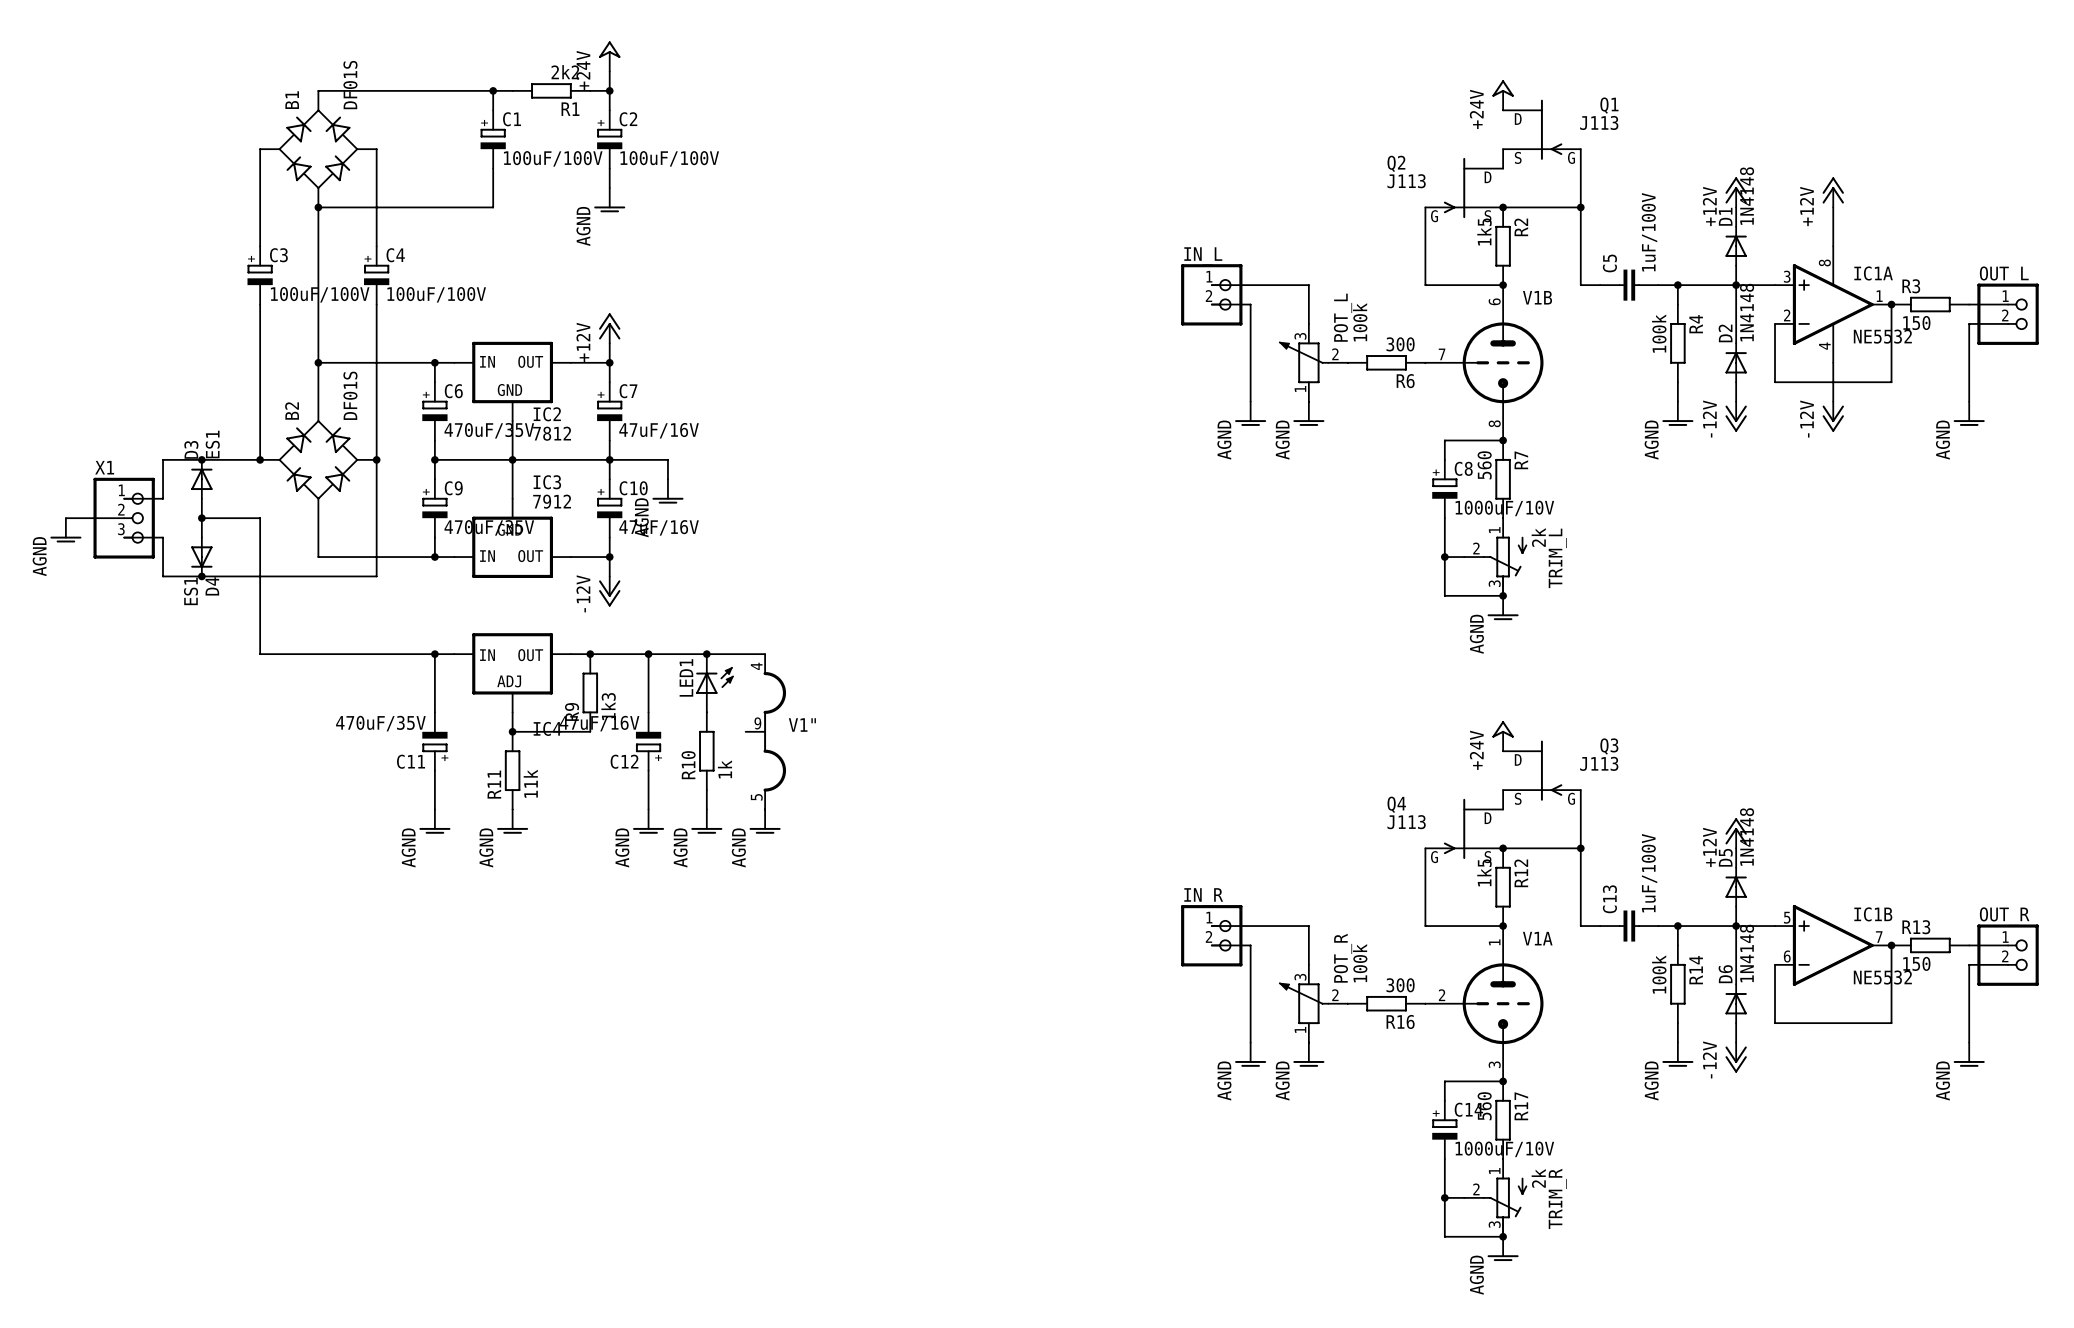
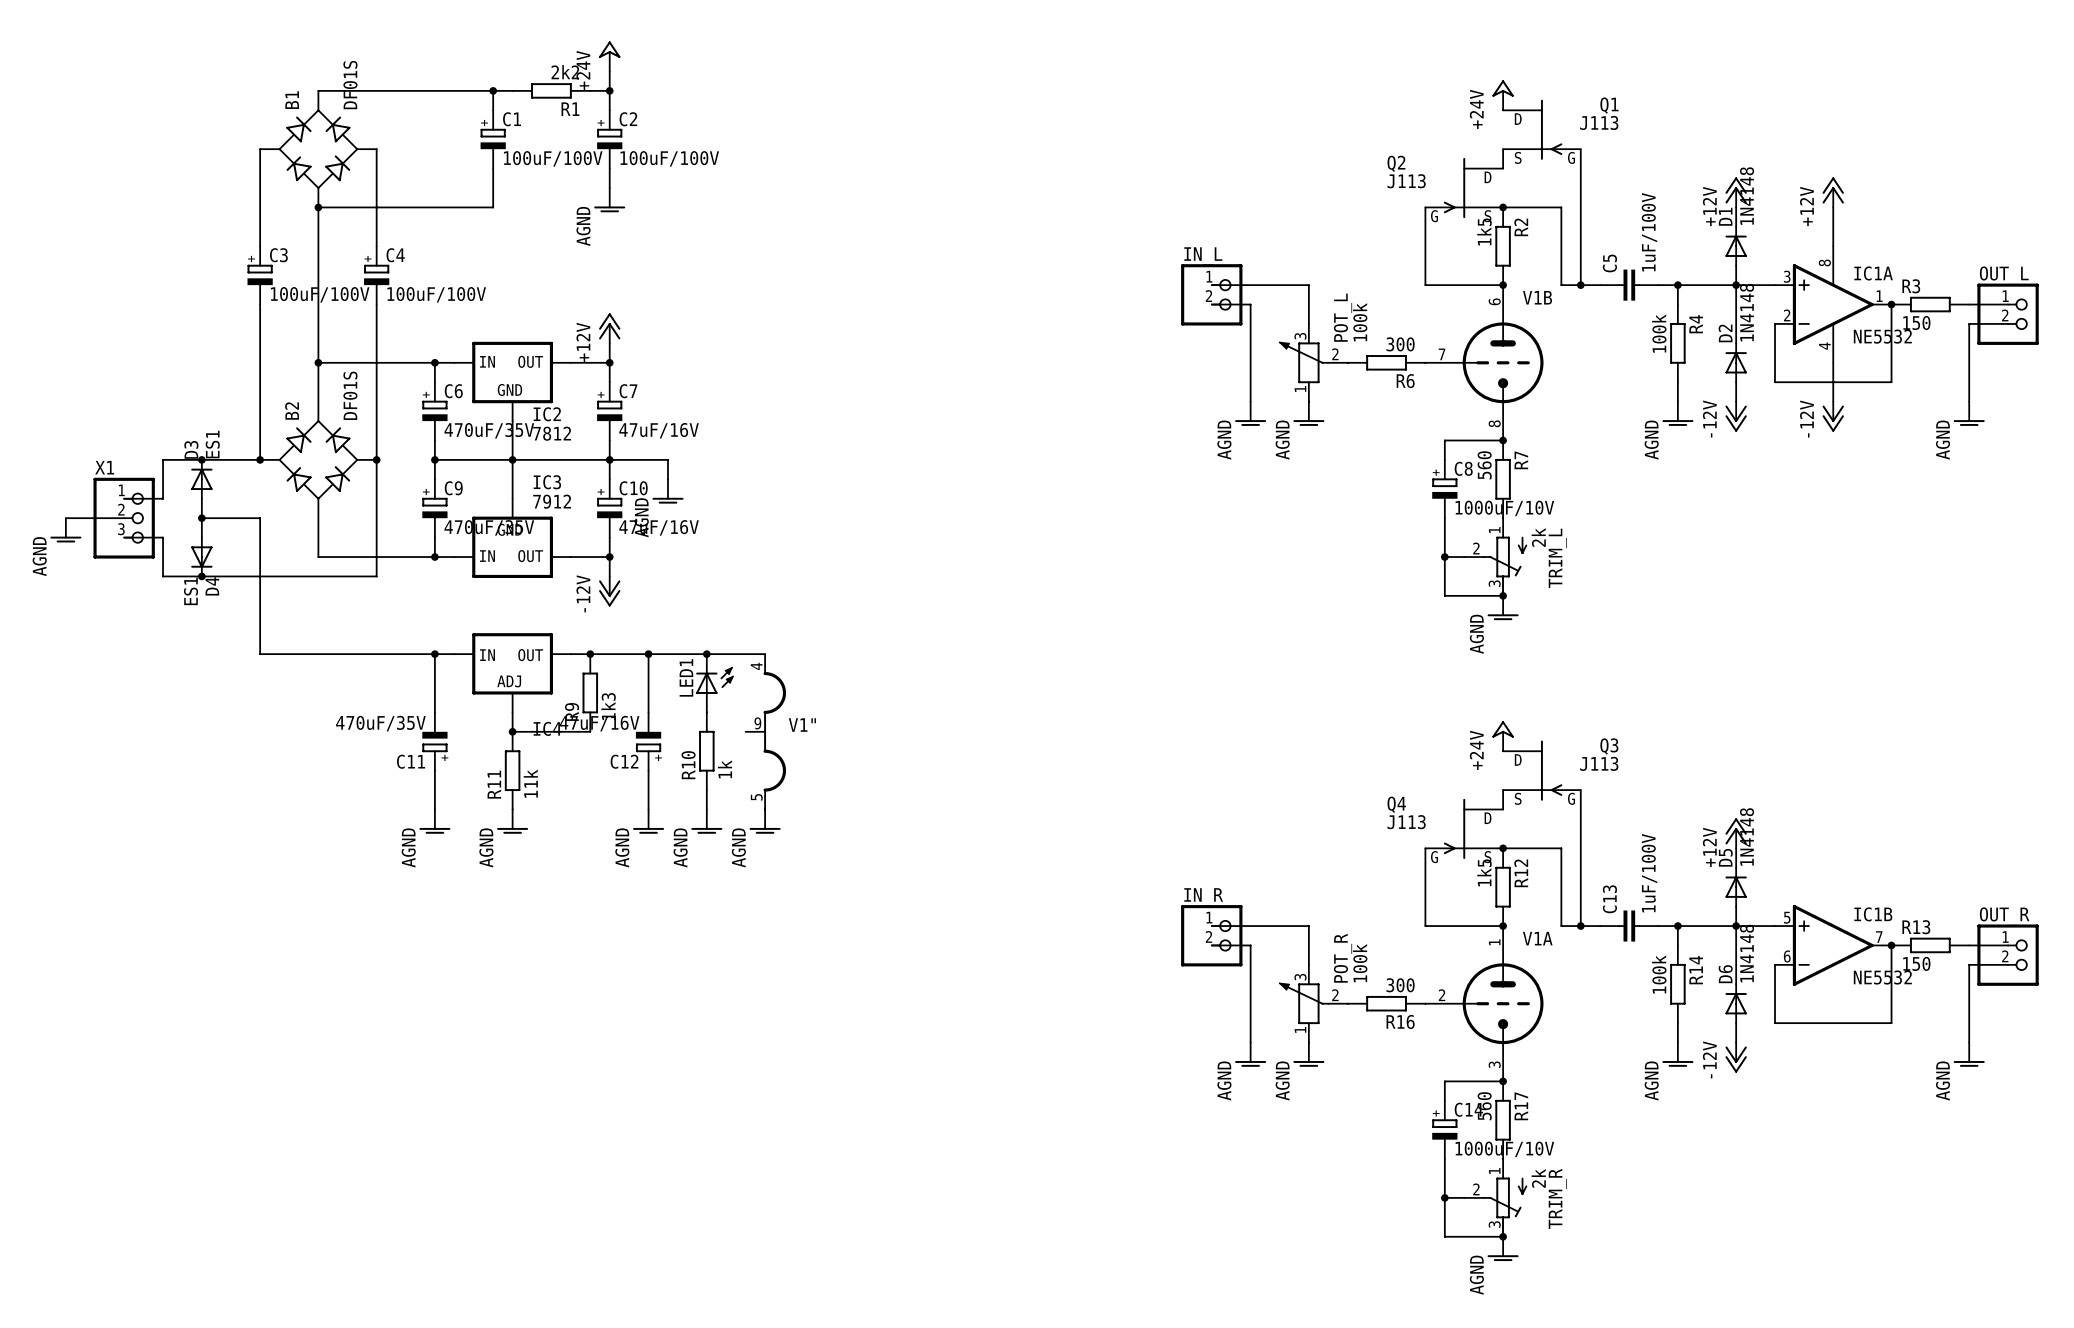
wire: (1561, 207) (1580, 207) -> (1561, 207) (1561, 285) (1580, 285)
junction: (1580, 207) -> none
junction: none -> (1580, 285)
wire: (1561, 848) (1580, 848) -> (1561, 848) (1561, 926) (1580, 926)
junction: (1580, 848) -> none
junction: none -> (1580, 926)

